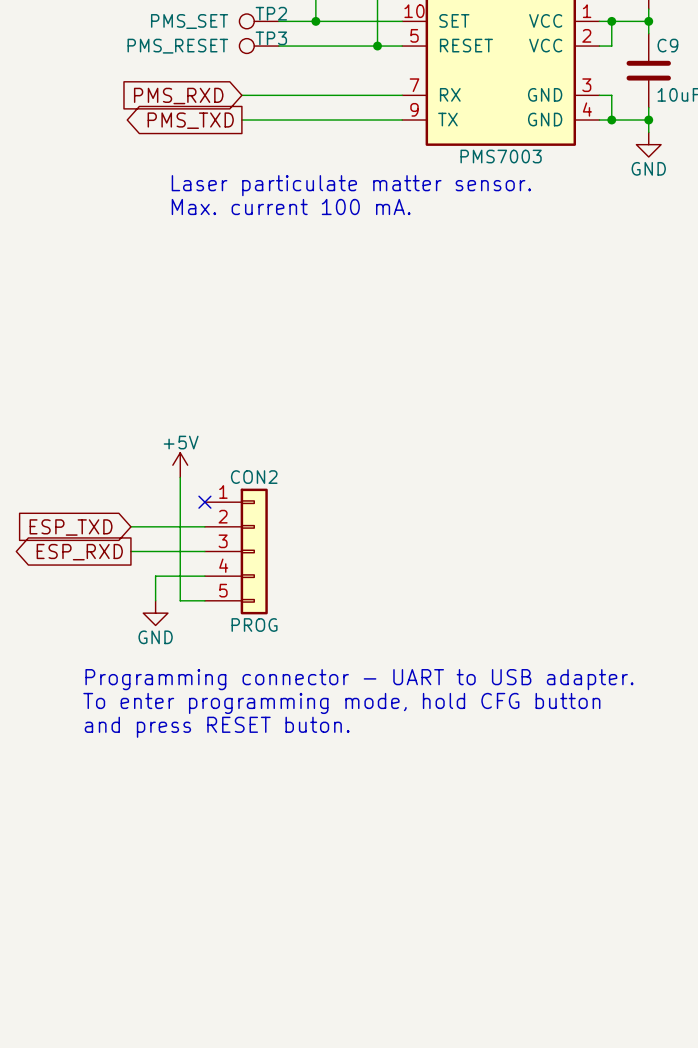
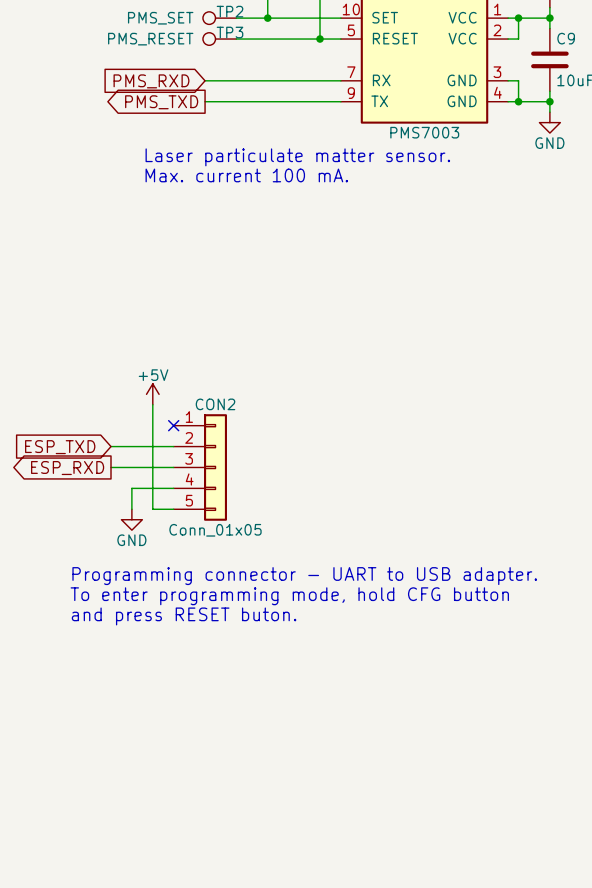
CON2 value: PROG (254, 625) -> Conn_01x05 (215, 530)

